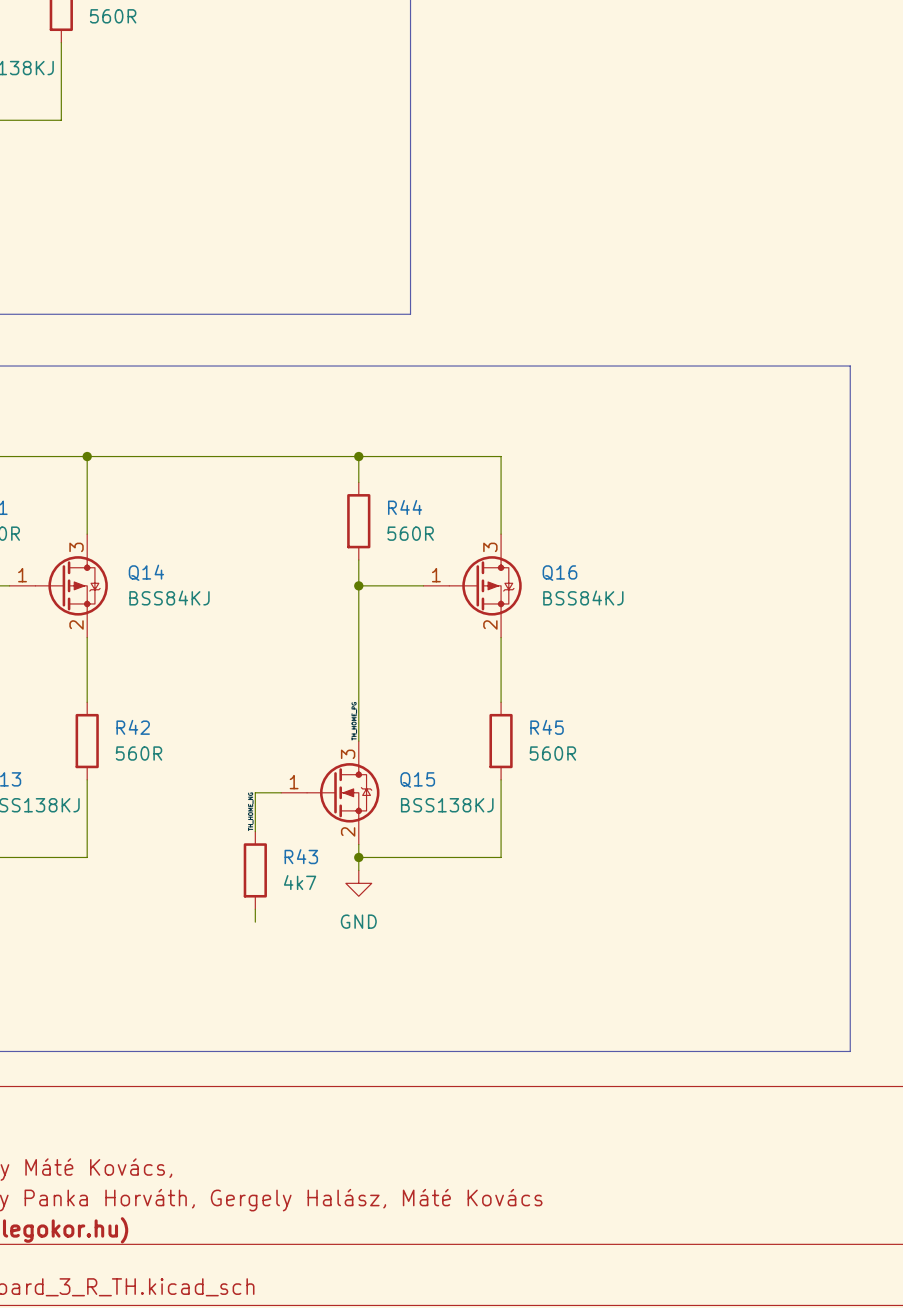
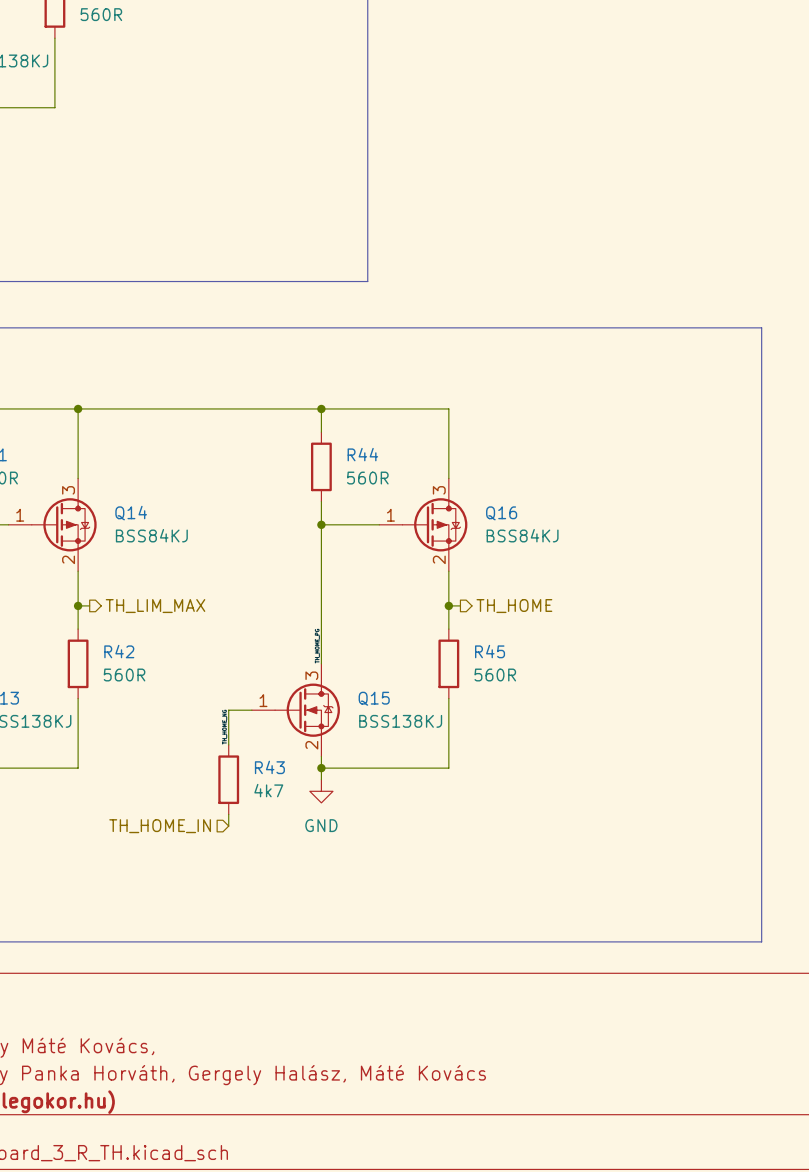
wire: none -> (78, 605) (89, 605)
junction: none -> (78, 605)
hierarchical label: none -> TH_LIM_MAX (155, 606)
wire: none -> (448, 605) (460, 605)
junction: none -> (448, 605)
hierarchical label: none -> TH_HOME (514, 606)
hierarchical label: none -> TH_HOME_IN (160, 826)

